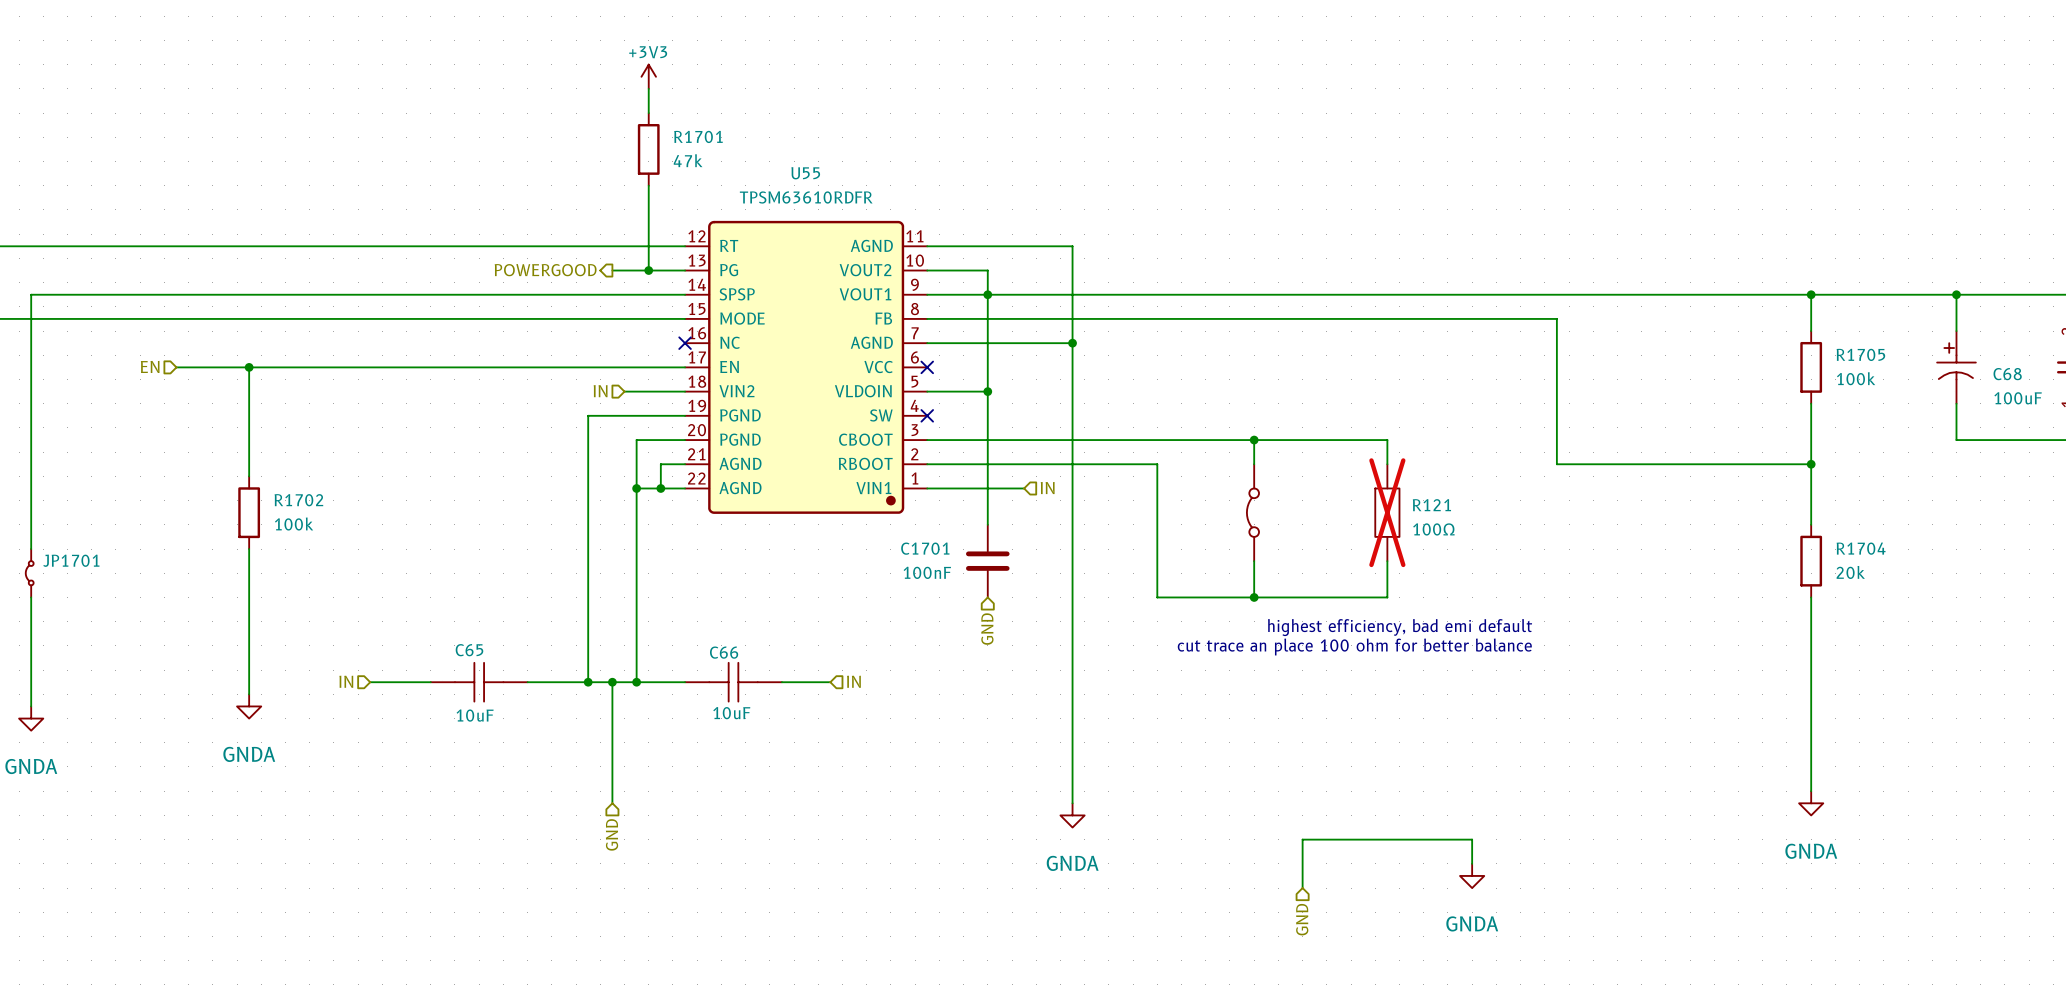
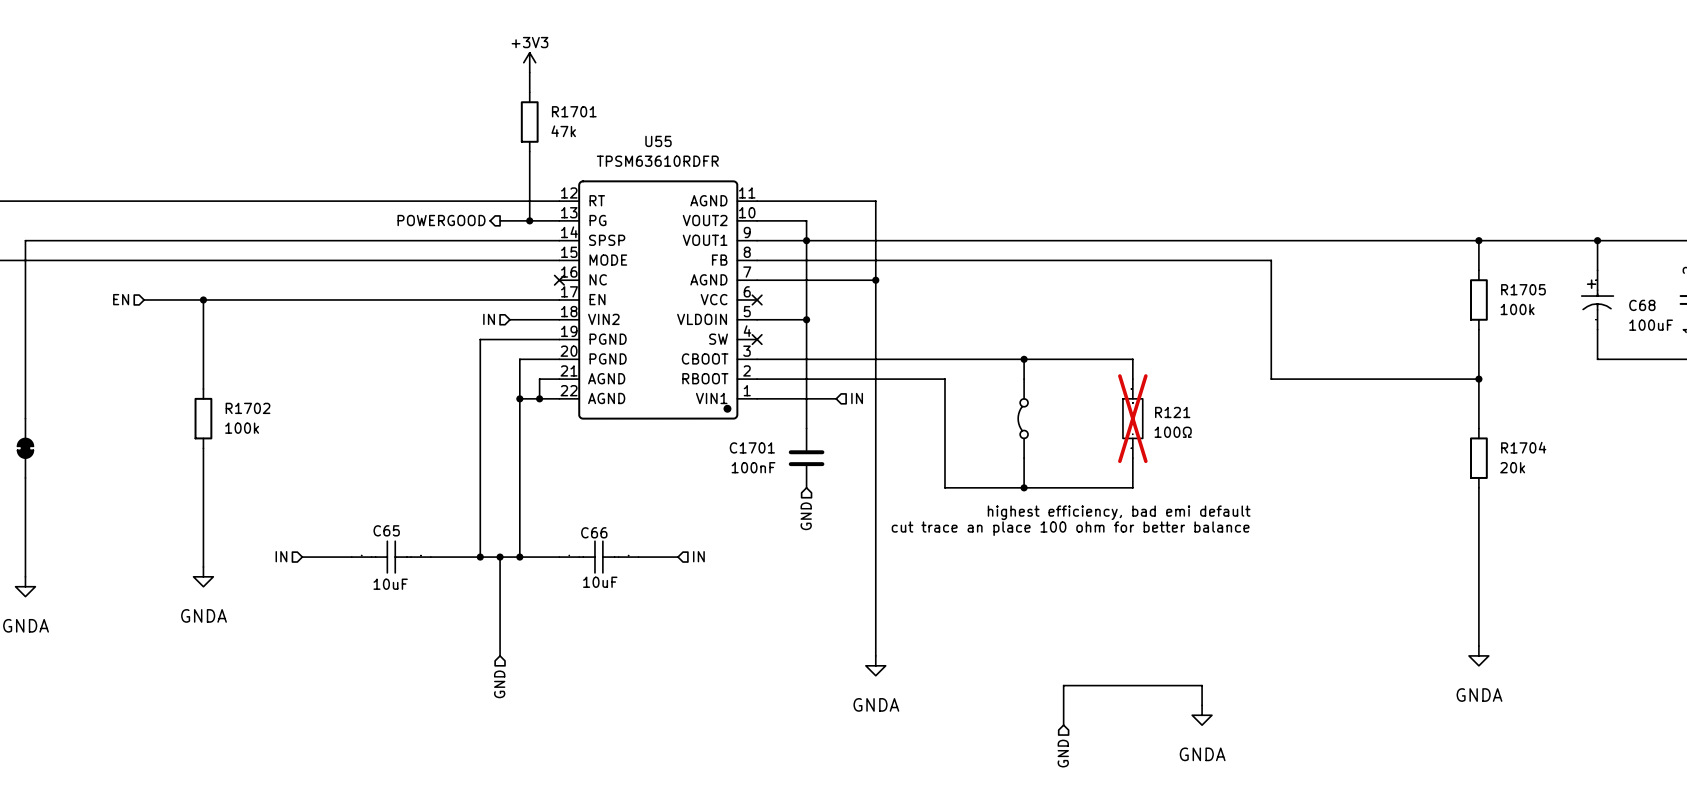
part: none -> (25, 448)
JP1701: (29, 573) -> none

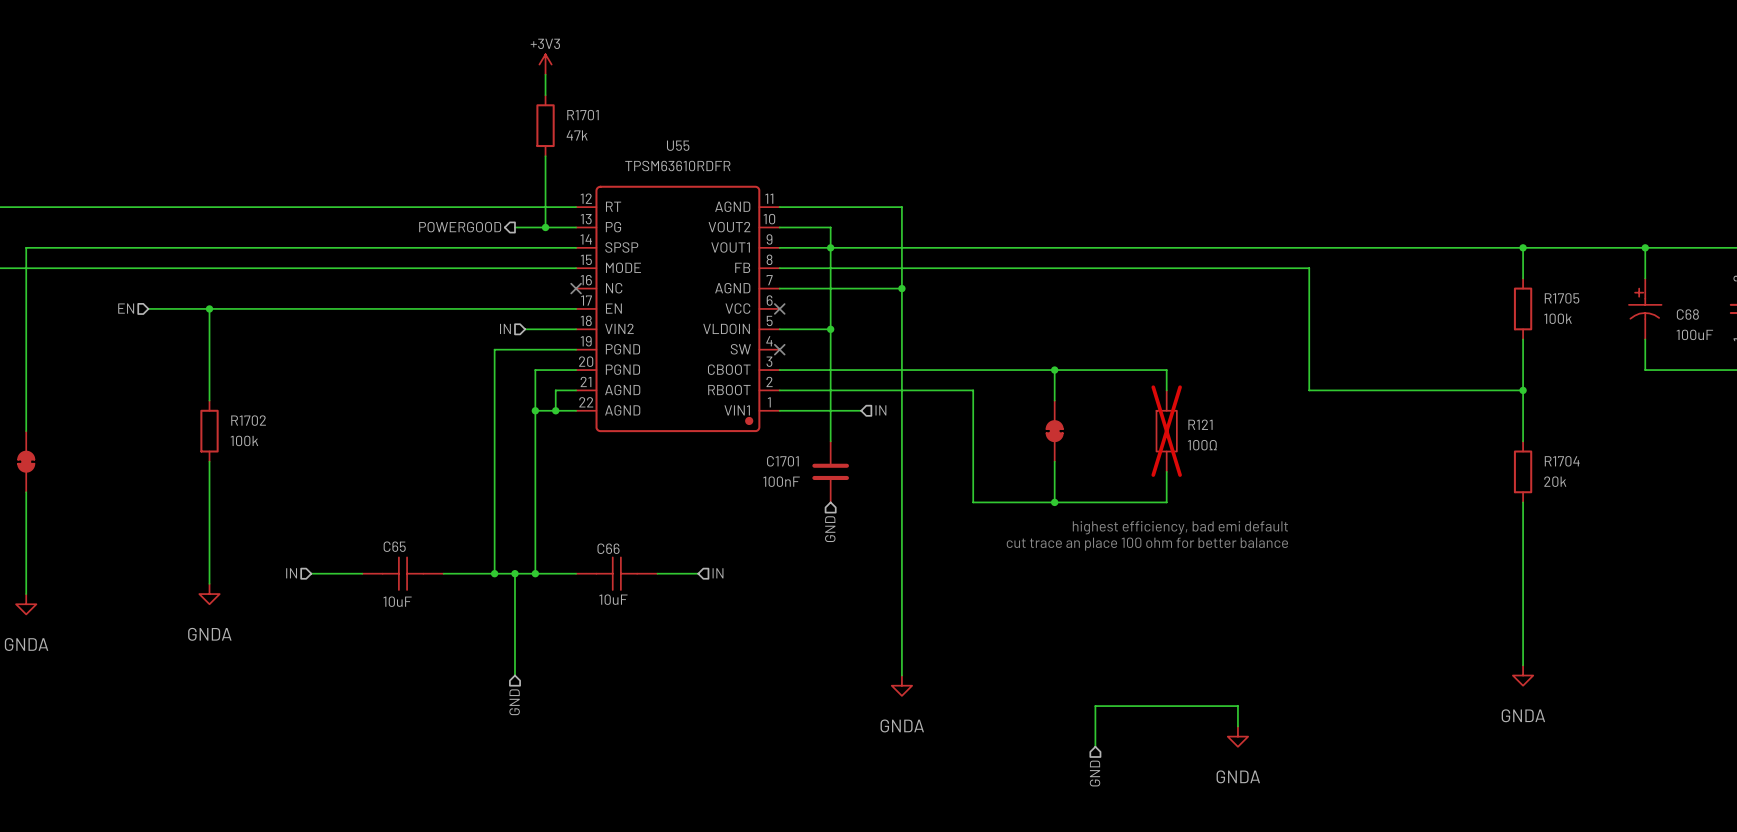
part symbol: [1018, 379, 1029, 459] -> [1046, 400, 1063, 462]

